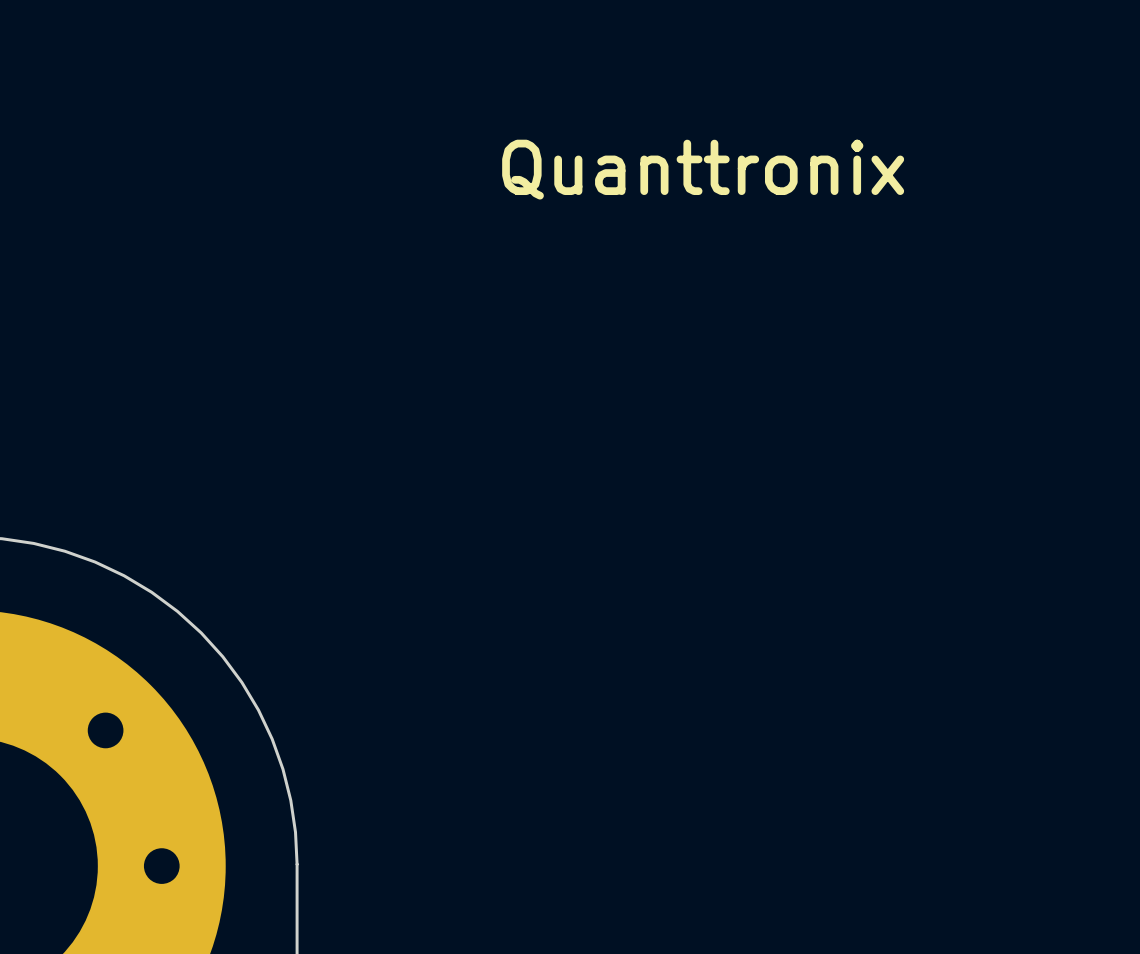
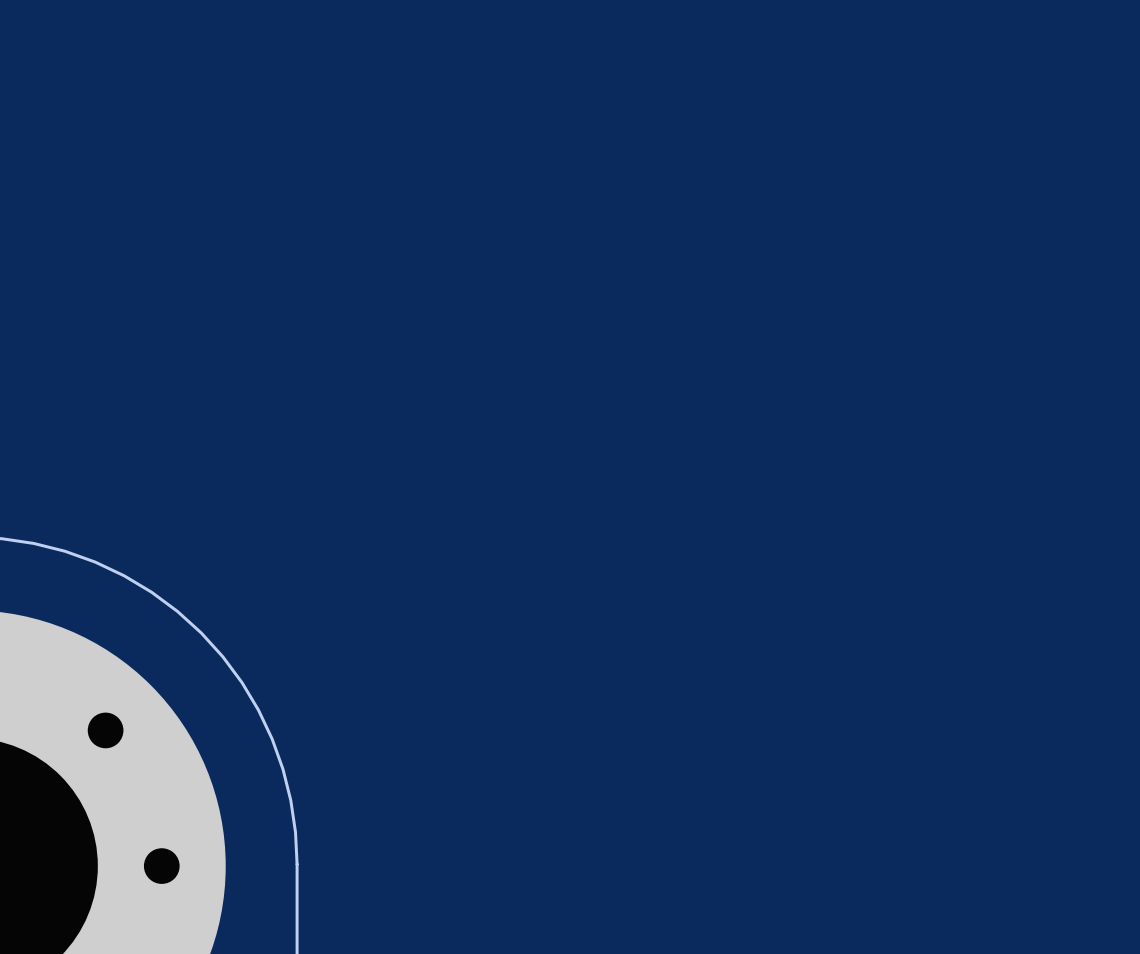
text: Quanttronix (703, 169) -> none

